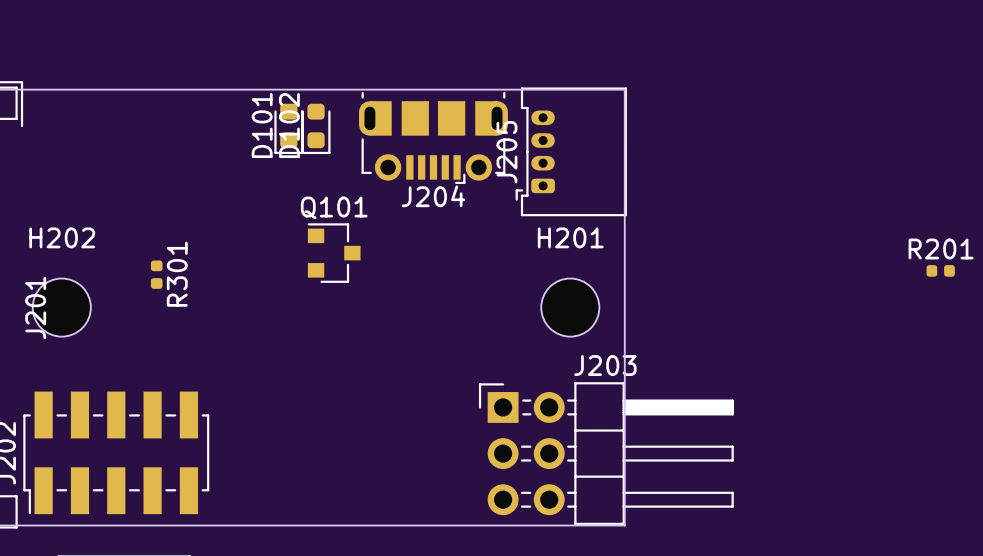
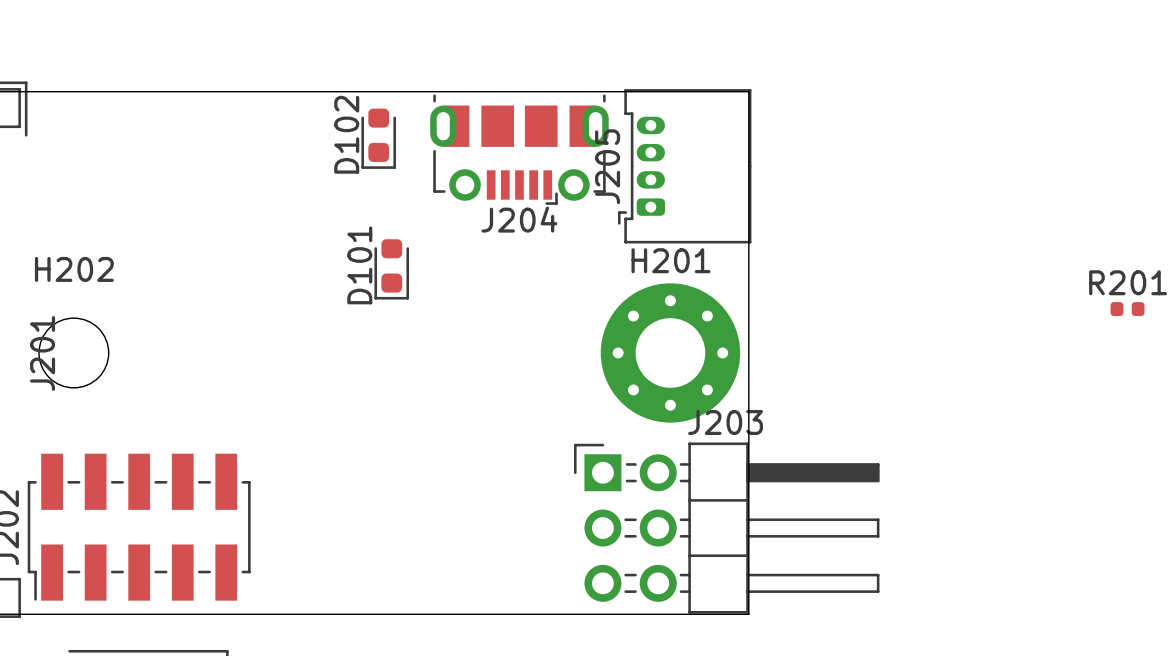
D101 position: (288, 128) -> (391, 269)
Q101: (334, 253) -> none
R301: (156, 274) -> none
H201 footprint: [541, 278, 600, 337] -> [600, 283, 741, 423]

